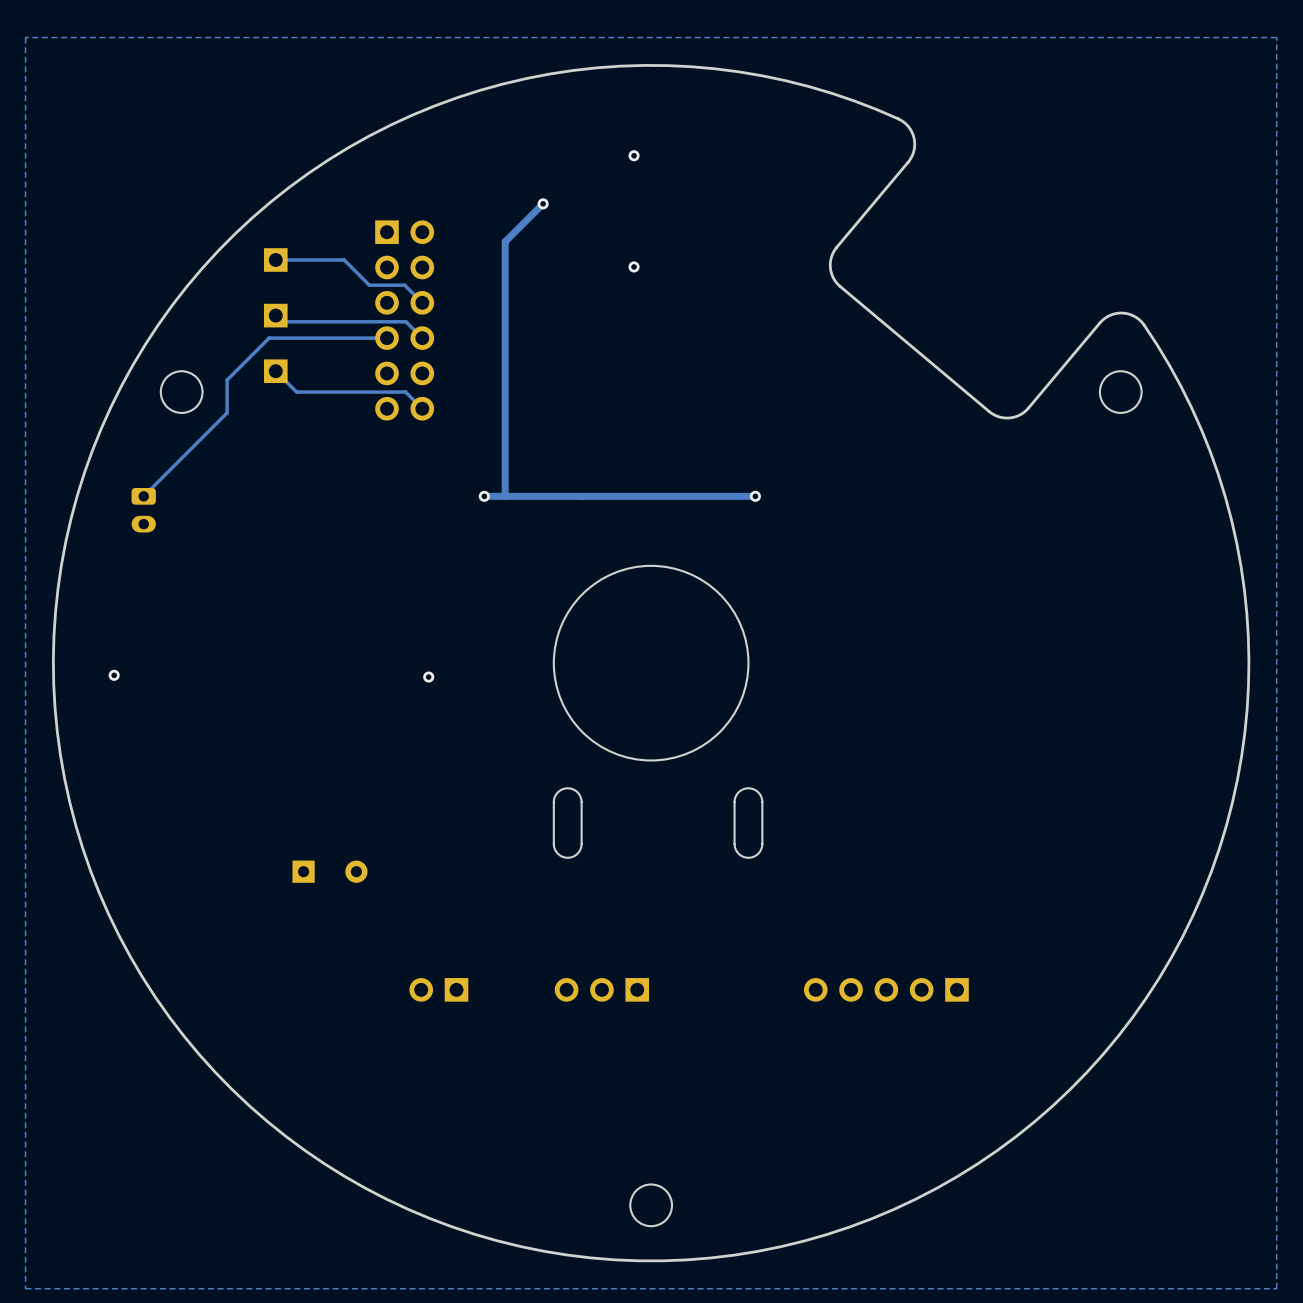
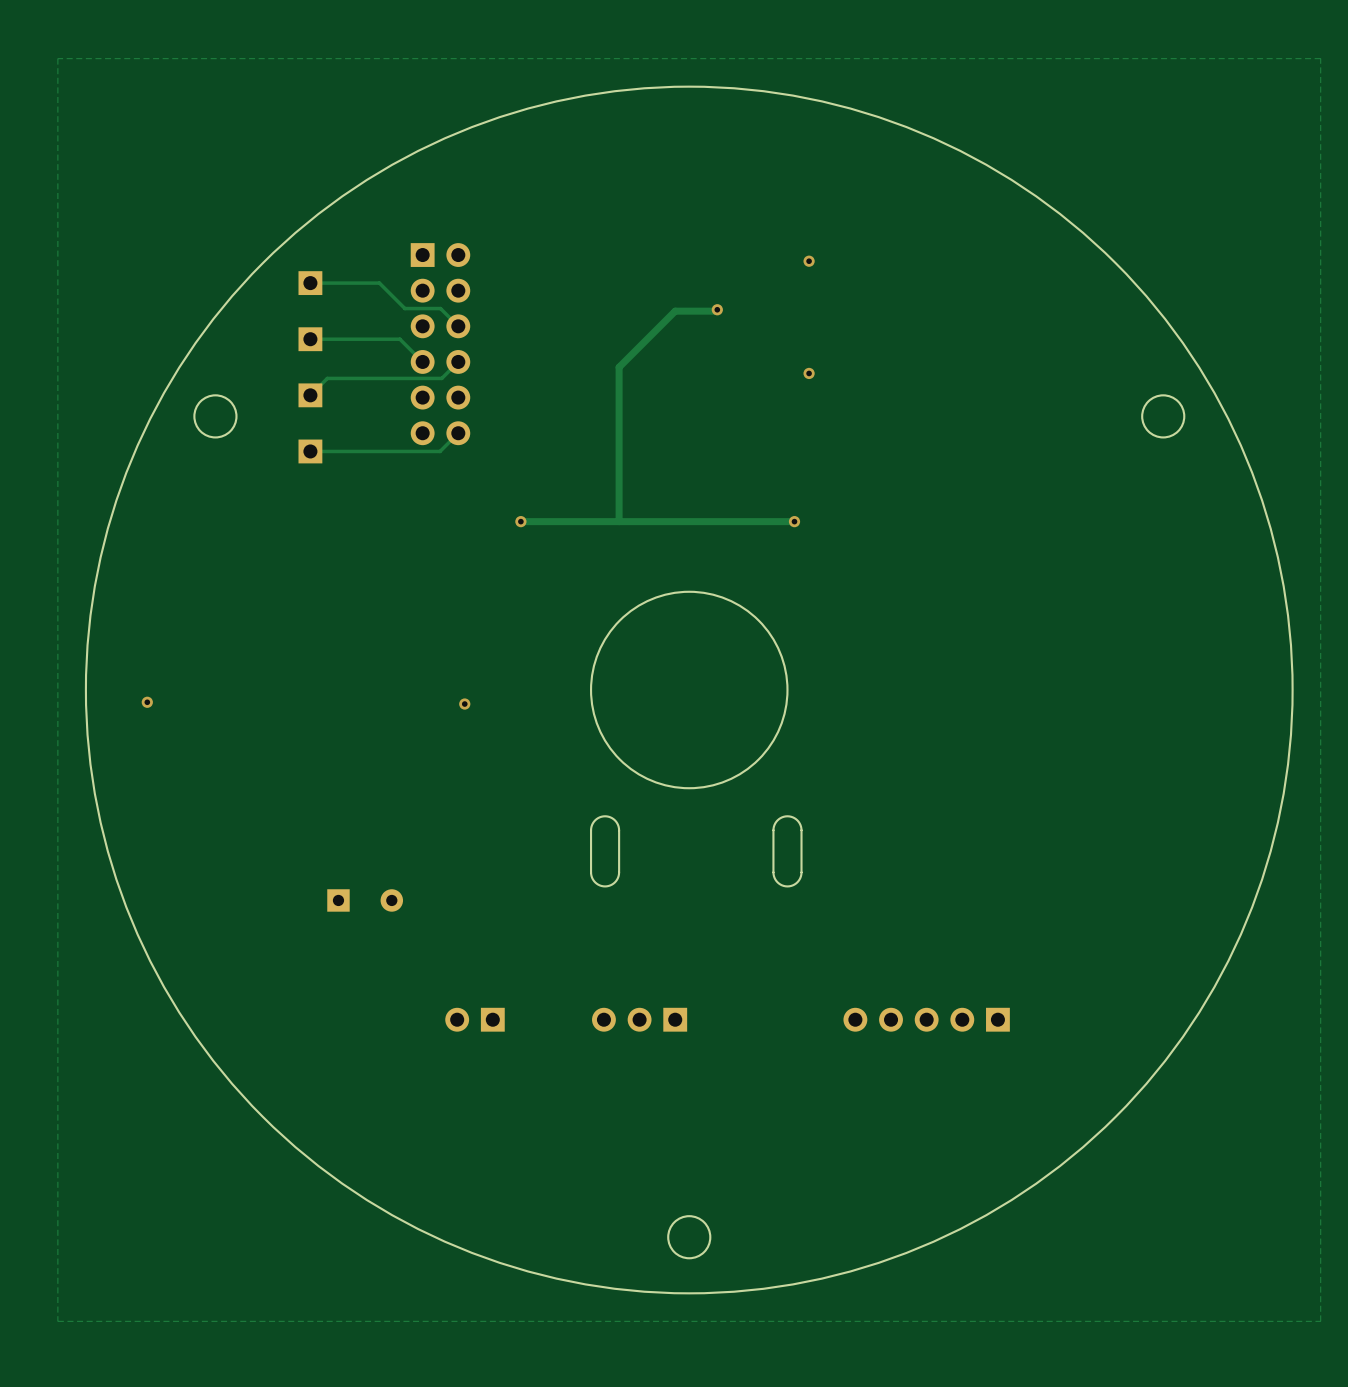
round board edge: none -> [84, 85, 1294, 1295]
board edge: (898, 118) (906, 124) (911, 132) (914, 141) (913, 153) (834, 250) (830, 267) (837, 283) (989, 411) (1003, 417) (1015, 416) (1026, 410) (1104, 318) (1116, 313) (1131, 315) (1144, 325) (1169, 365) (1191, 407) (1210, 451) (1231, 519) (1241, 566) (1248, 637) (1248, 685) (1241, 756) (1232, 802) (1211, 871) (1193, 915) (1171, 957) (1132, 1017) (1102, 1054) (1052, 1105) (997, 1150) (957, 1176) (915, 1199) (849, 1227) (803, 1241) (733, 1255) (686, 1259) (615, 1259) (567, 1255) (520, 1246) (474, 1234) (407, 1209) (365, 1188) (304, 1150) (266, 1121) (215, 1071) (183, 1035) (142, 977) (119, 936) (90, 870) (75, 825) (60, 755) (55, 708) (53, 660) (55, 613) (65, 542) (77, 496) (101, 428) (133, 364) (158, 324) (202, 268) (235, 233) (270, 201) (328, 159) (390, 124) (434, 105) (479, 90) (549, 74) (596, 67) (667, 65) (738, 71) (785, 80) (831, 93) (898, 118) -> none
via: (634, 155) -> none
track: (543, 203) (505, 241) (505, 496) -> none
via: (543, 203) -> none
via: none -> (809, 261)
via position: (634, 266) -> (717, 309)
track: none -> (717, 309) (675, 311) (619, 367) (619, 521)
track: (275, 315) (281, 321) (405, 321) (422, 338) -> (310, 339) (399, 339) (422, 361)
track: (387, 338) (269, 338) (227, 380) (227, 412) (143, 496) -> none
track: none -> (458, 361) (441, 378) (327, 378) (310, 395)
via: none -> (809, 373)
track: (275, 371) (296, 392) (405, 392) (422, 408) -> (310, 451) (440, 451) (458, 433)
part: none -> (310, 451)
part: (143, 510) -> none

